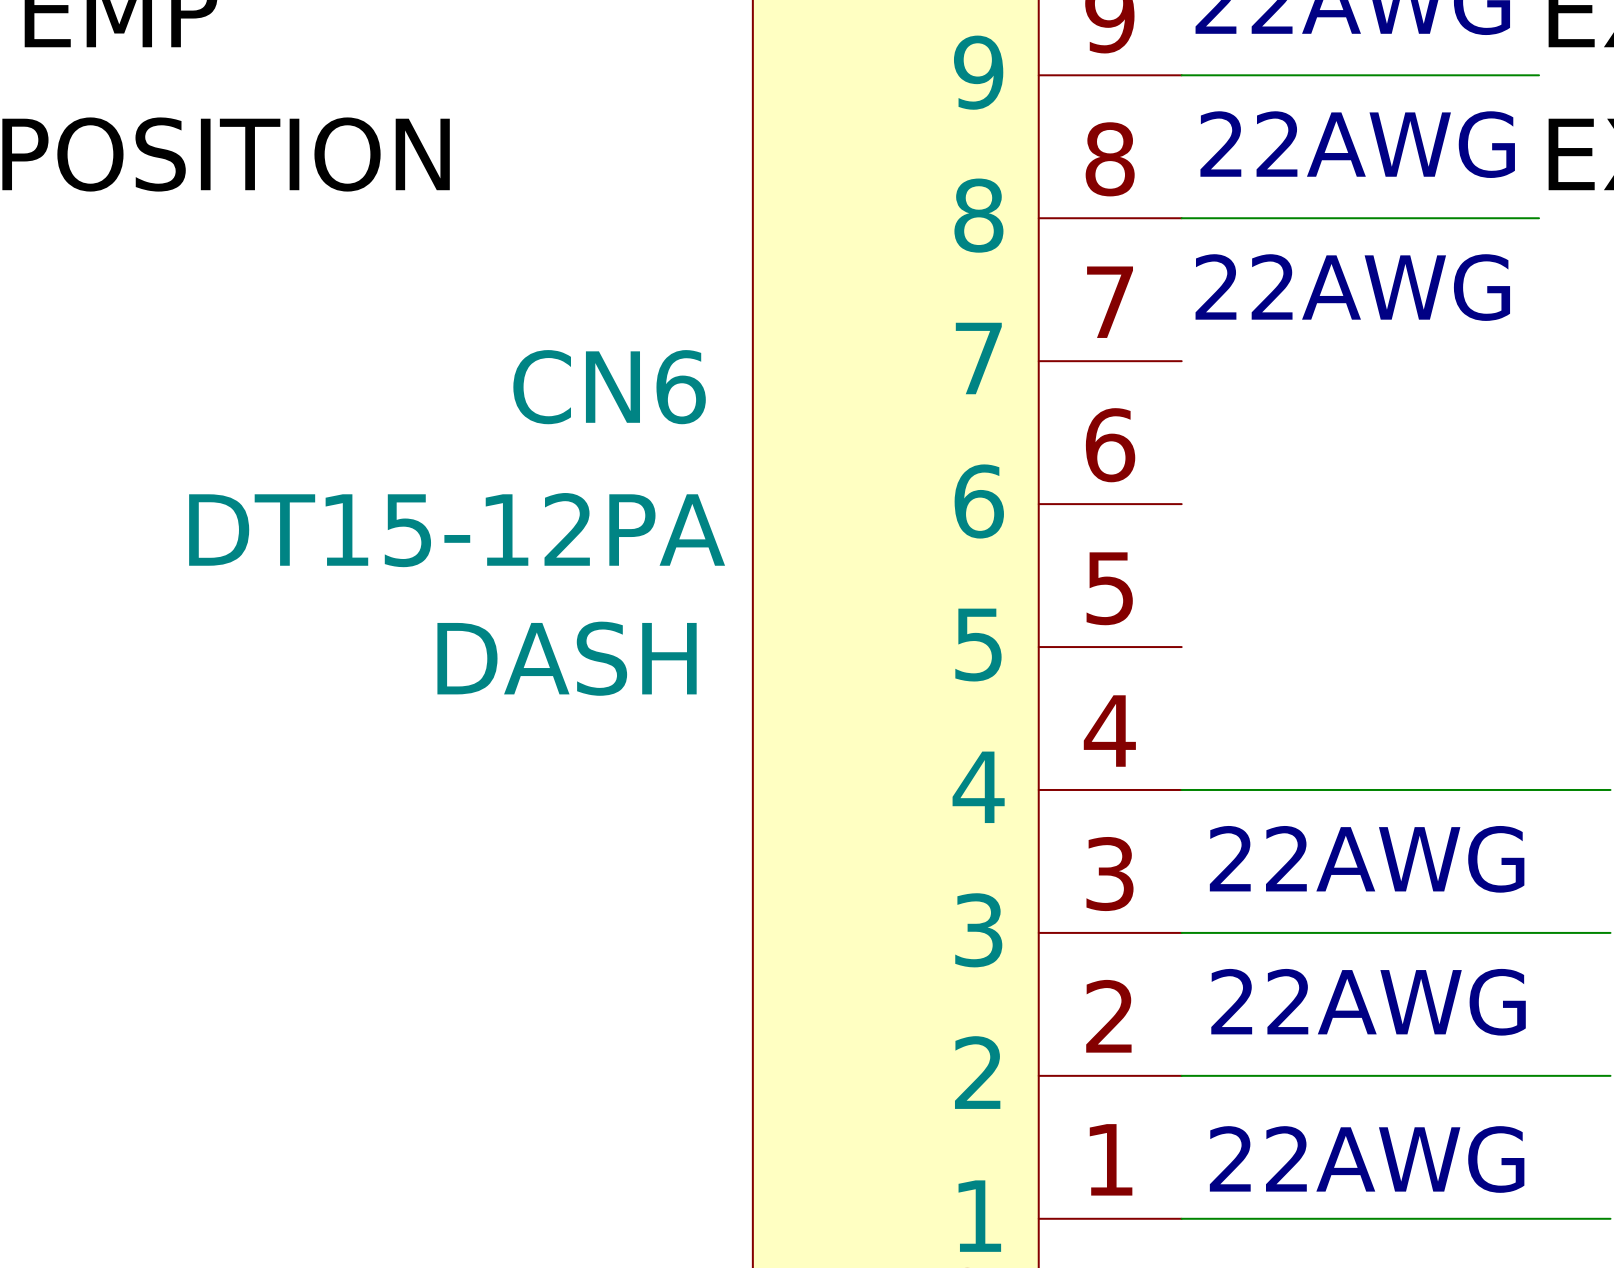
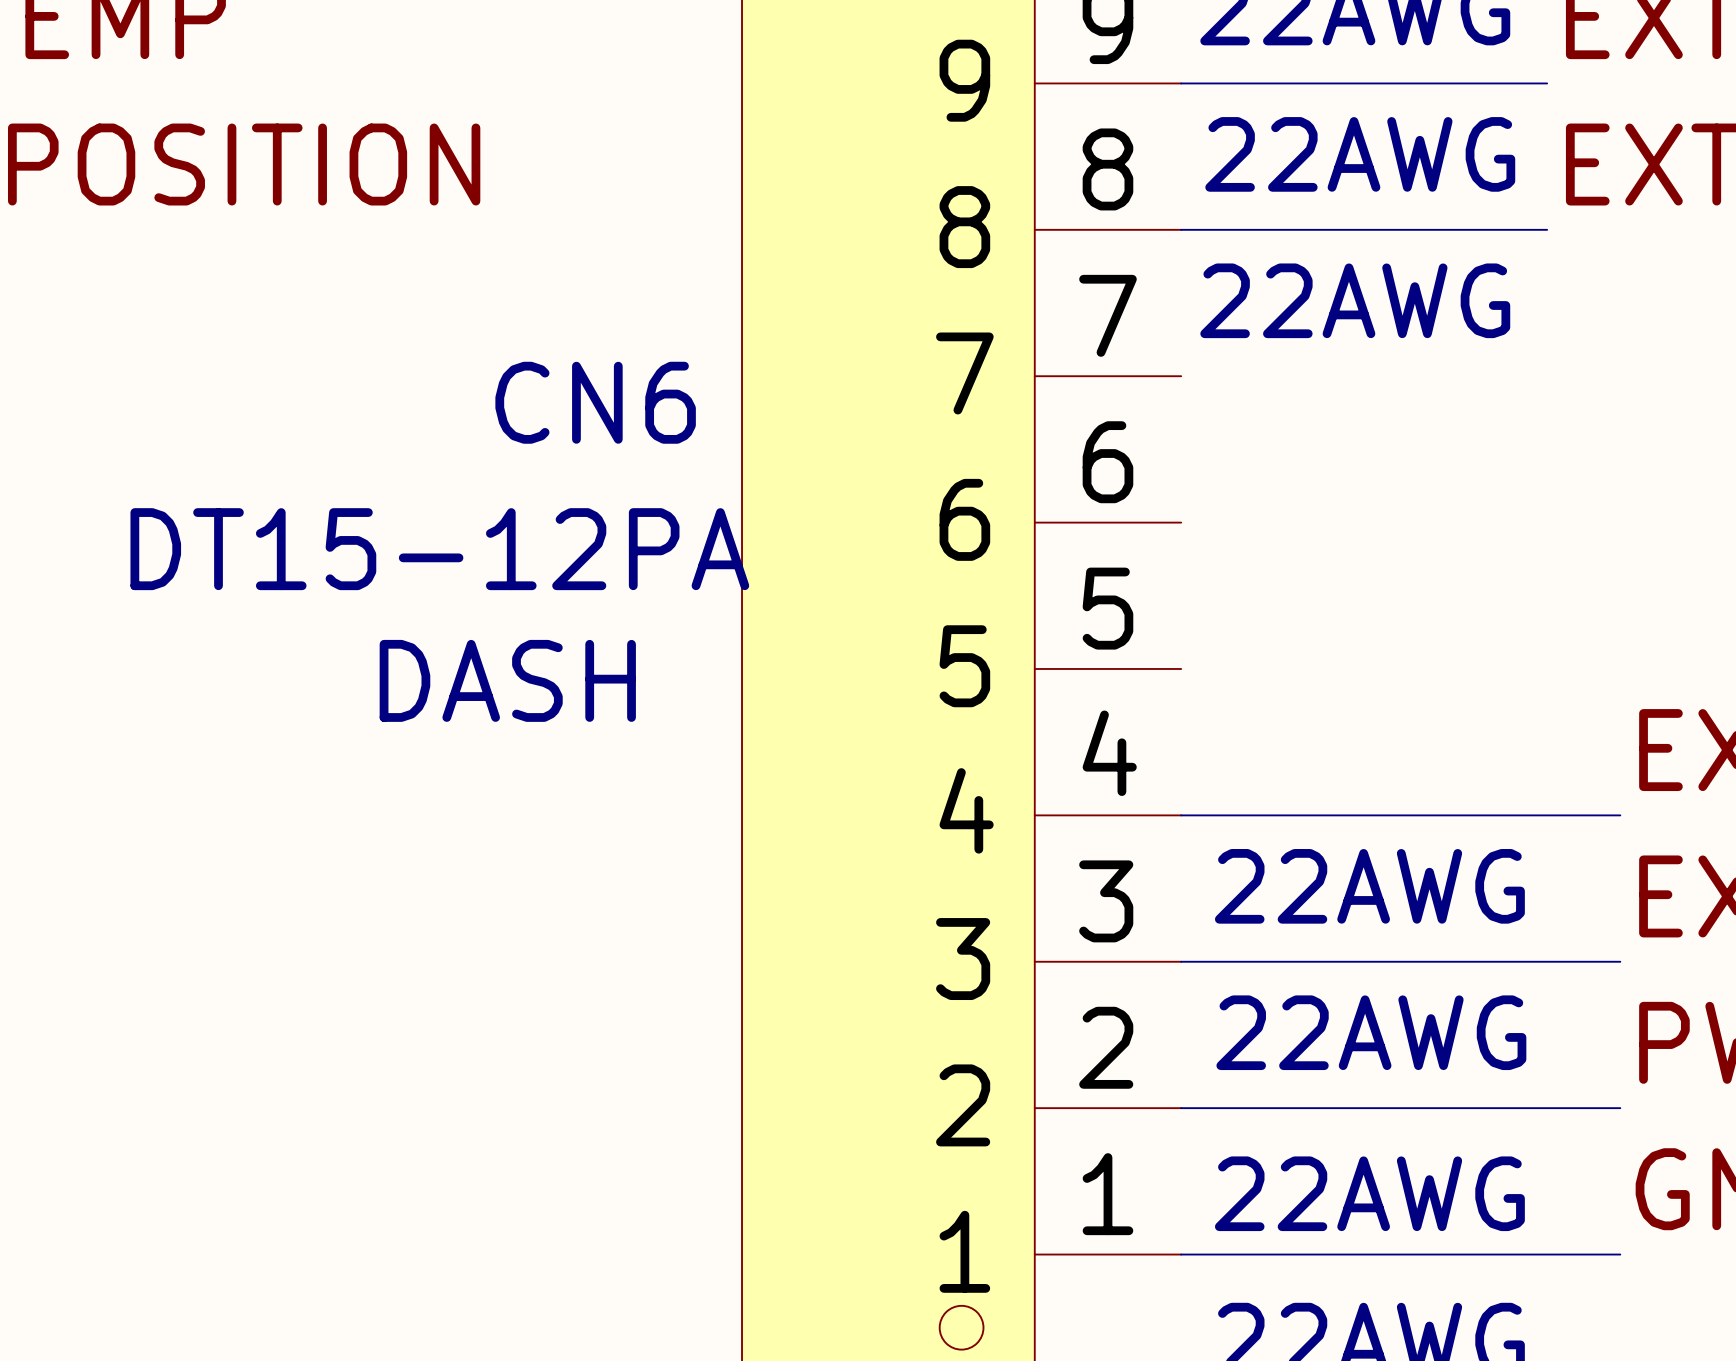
CN6 text position: DASH (567, 658) -> DASH (507, 680)

